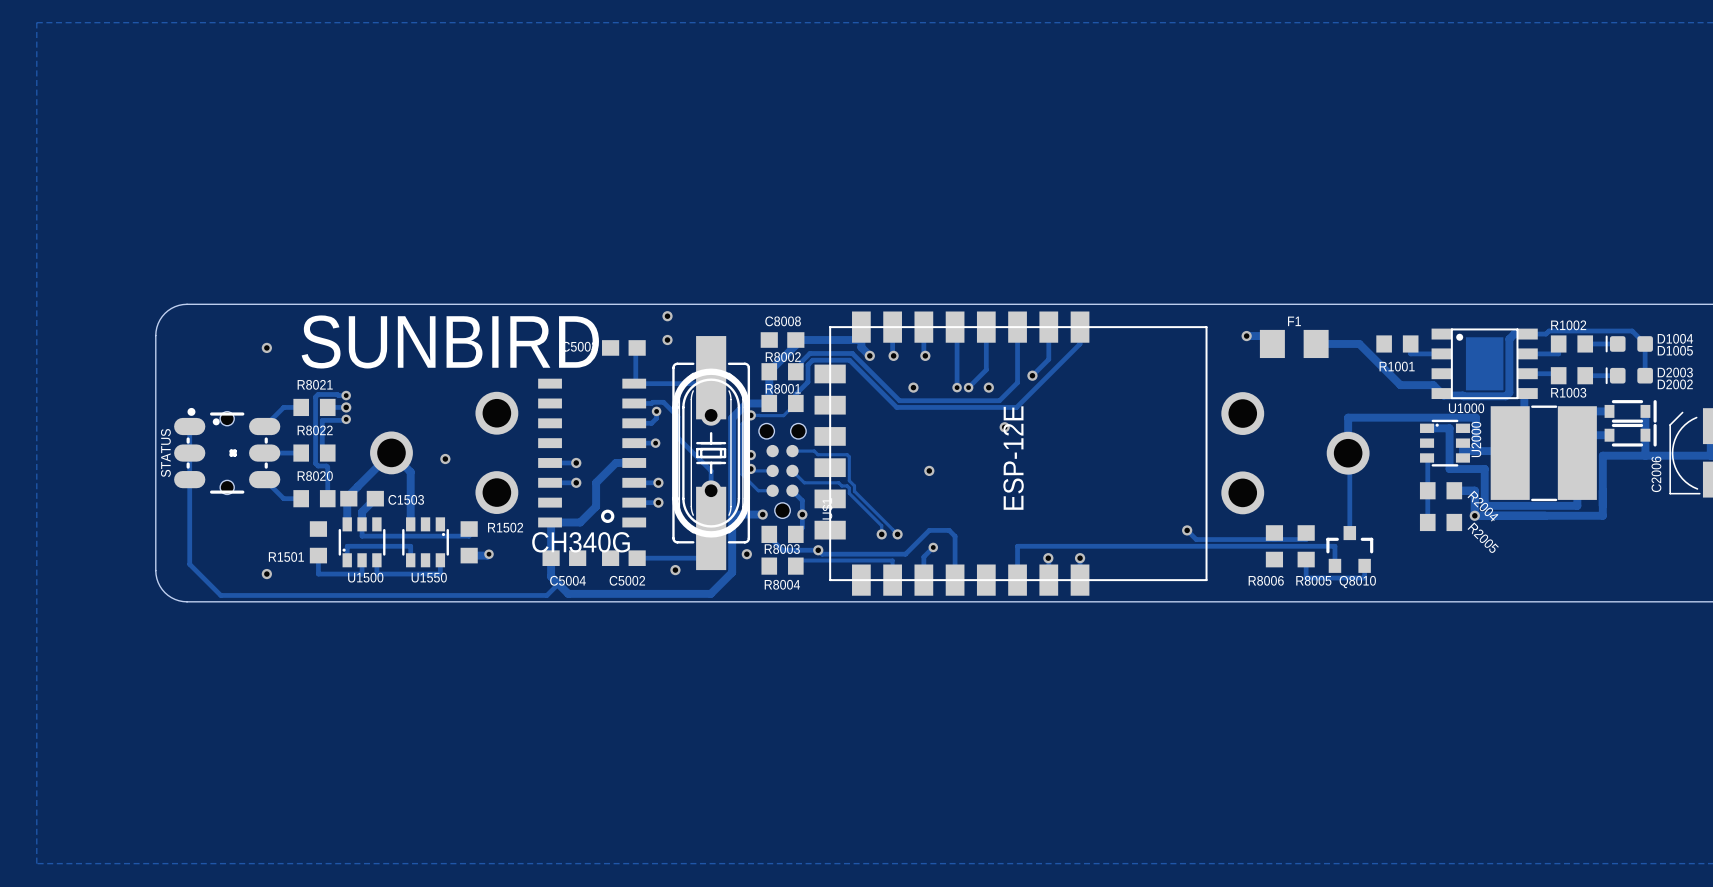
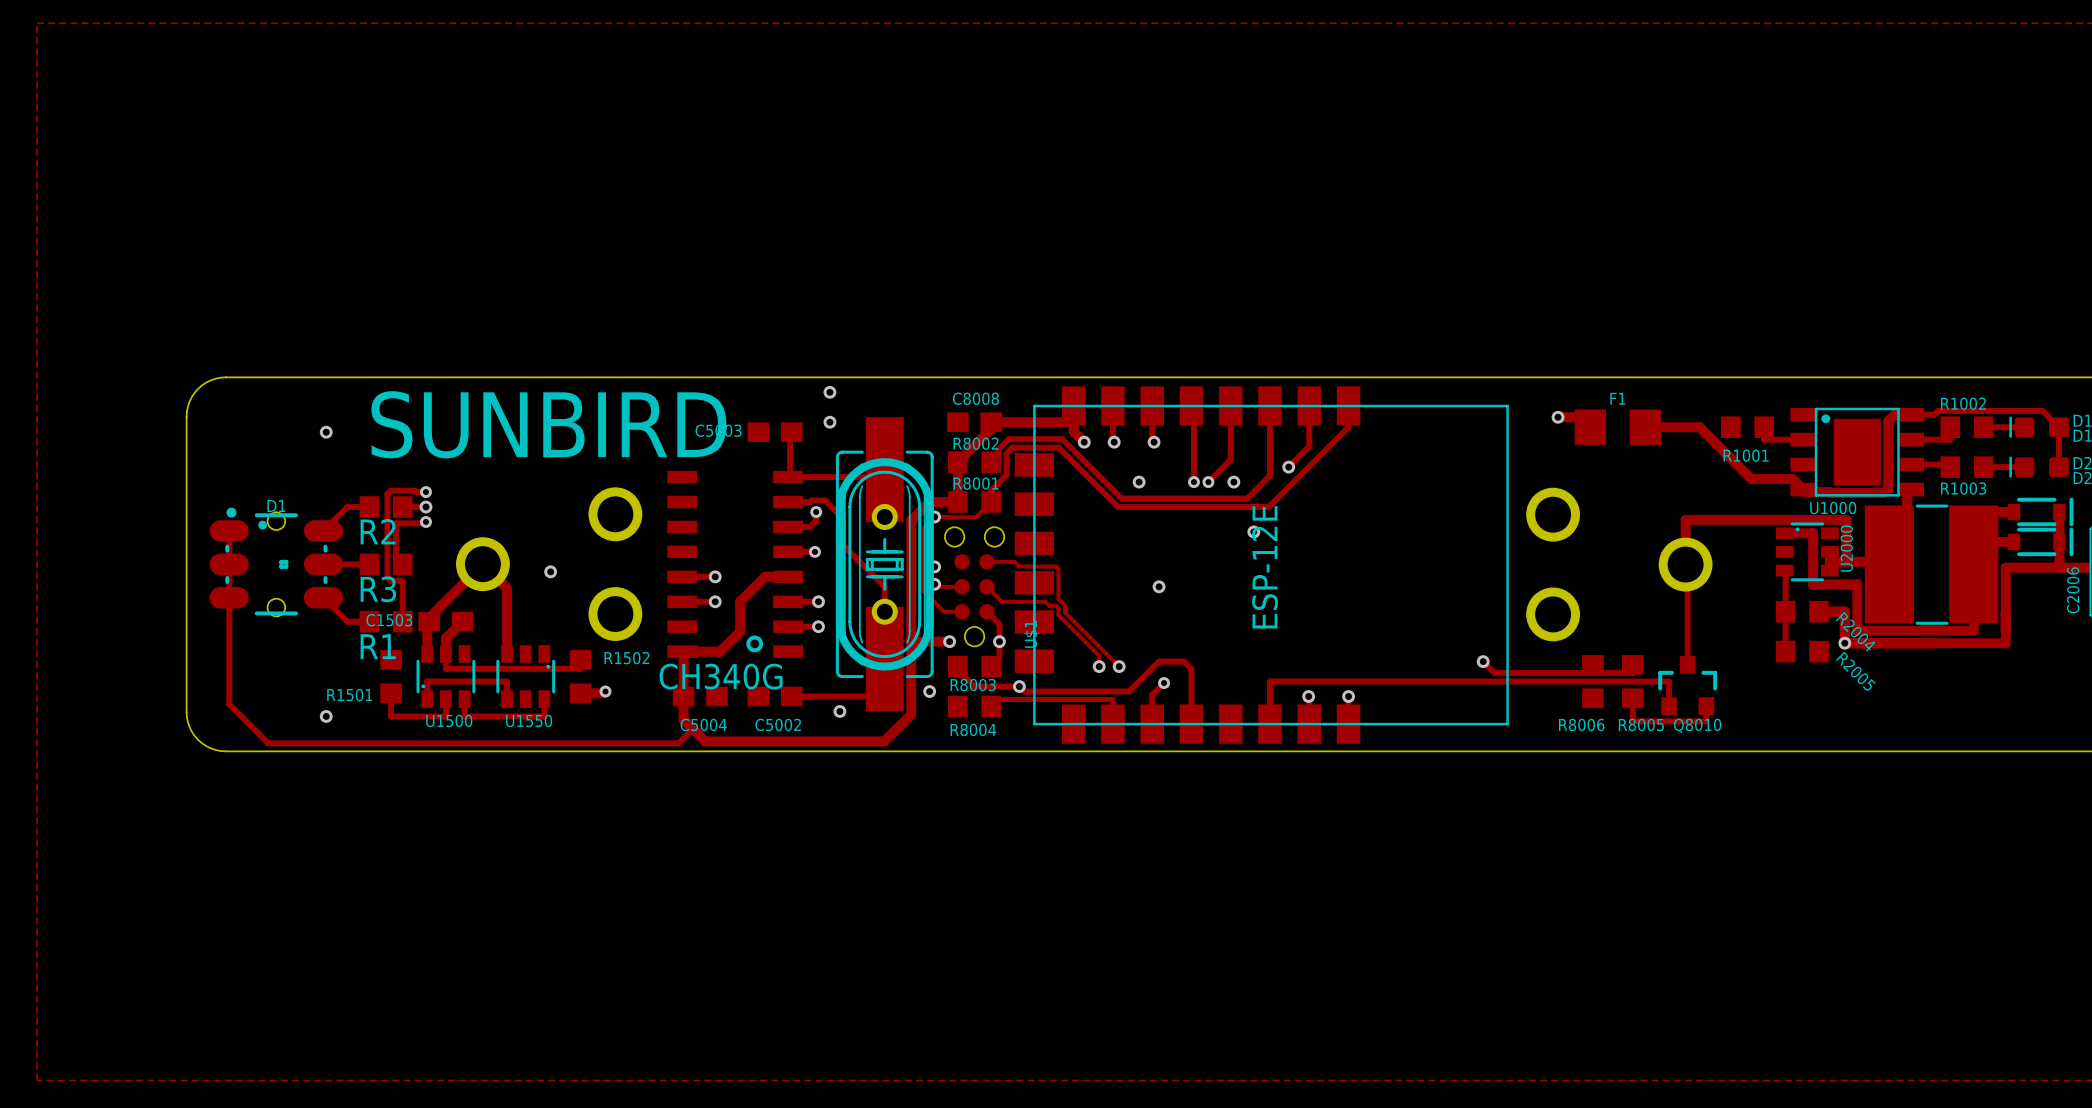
R8021 name: R8021 (315, 384) -> R2 (378, 531)
R8022 name: R8022 (315, 430) -> R3 (378, 589)
STATUS name: STATUS (165, 453) -> D1 (276, 506)
R8020 name: R8020 (315, 476) -> R1 (378, 646)
C1503 name position: C1503 (406, 499) -> C1503 (389, 620)

